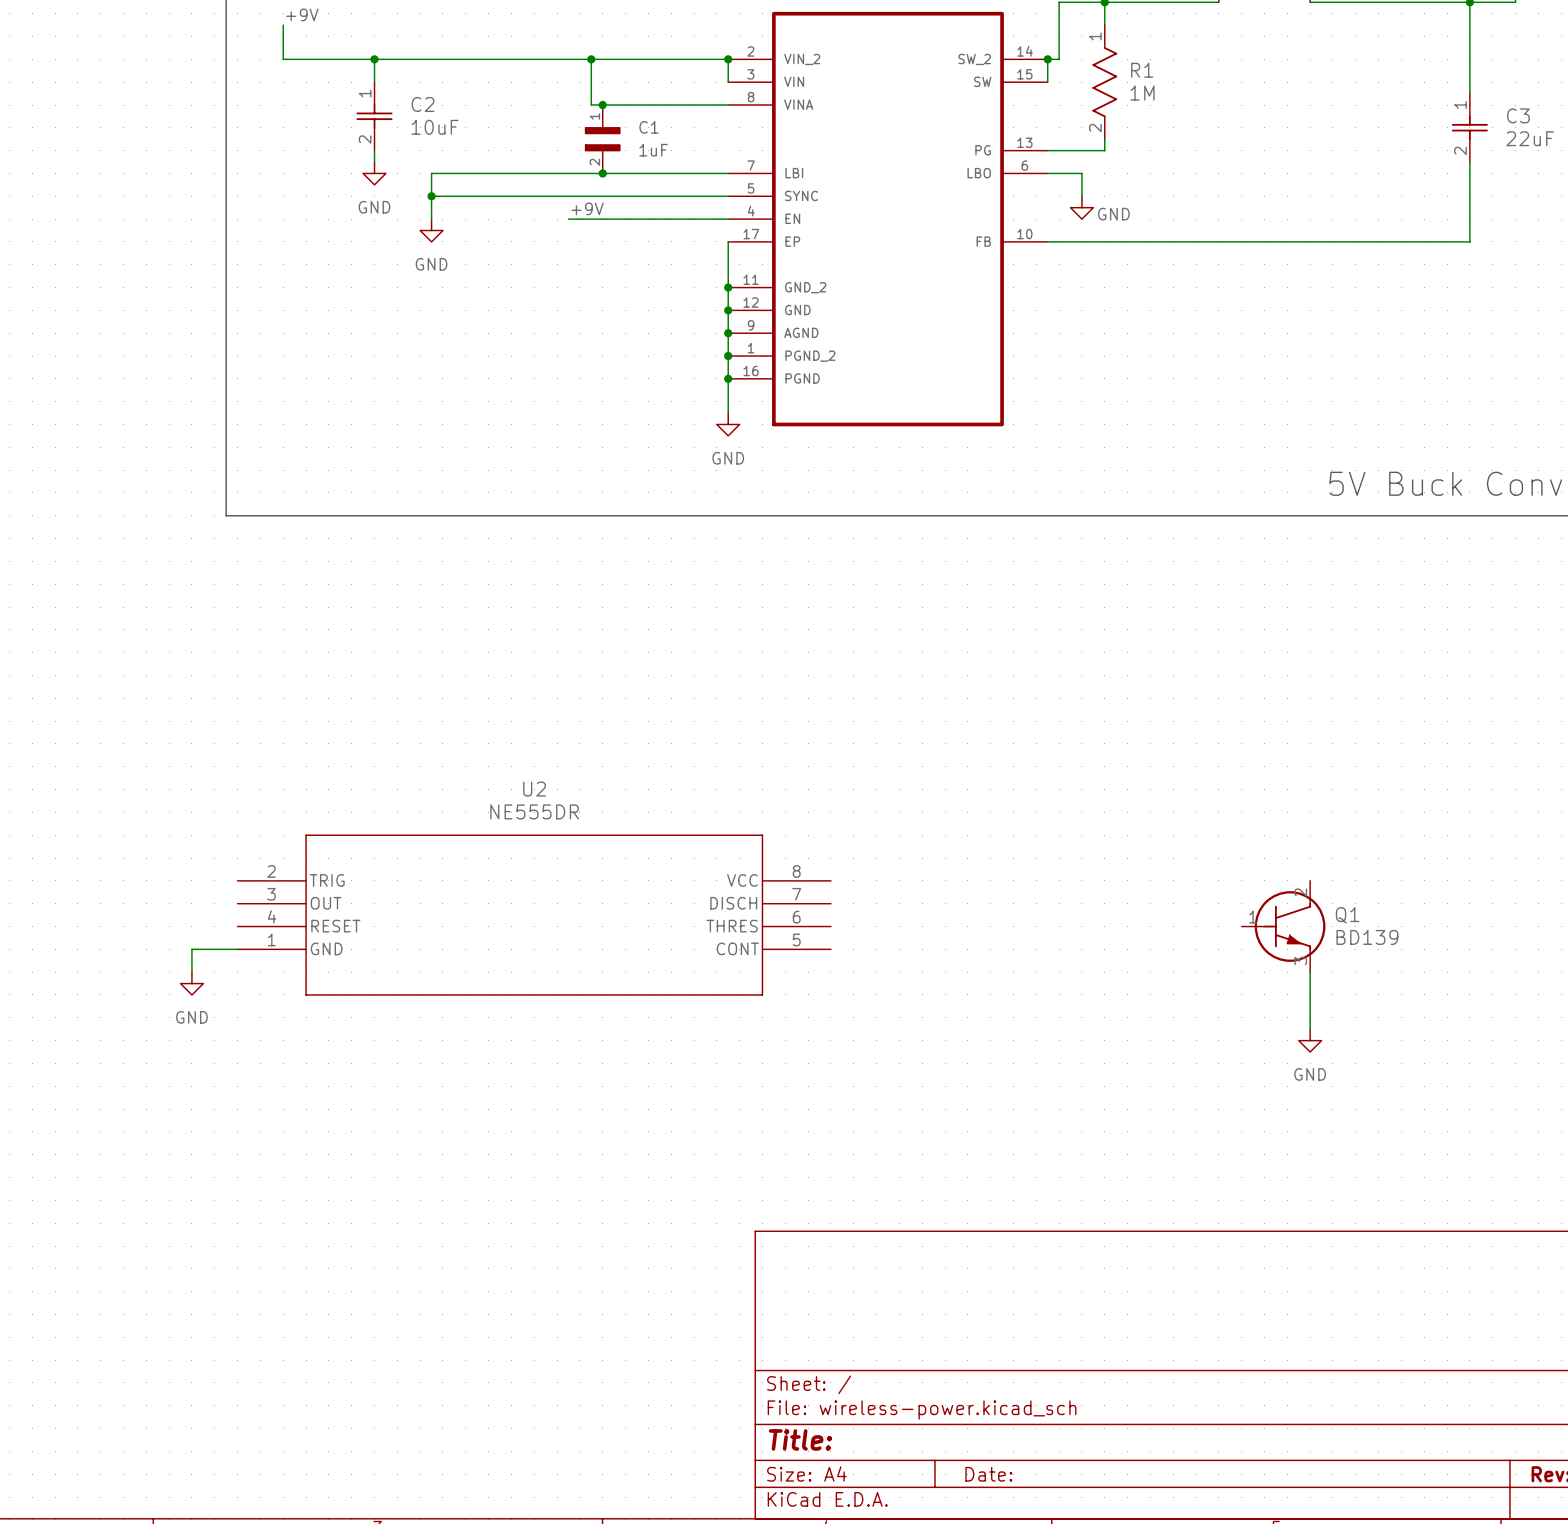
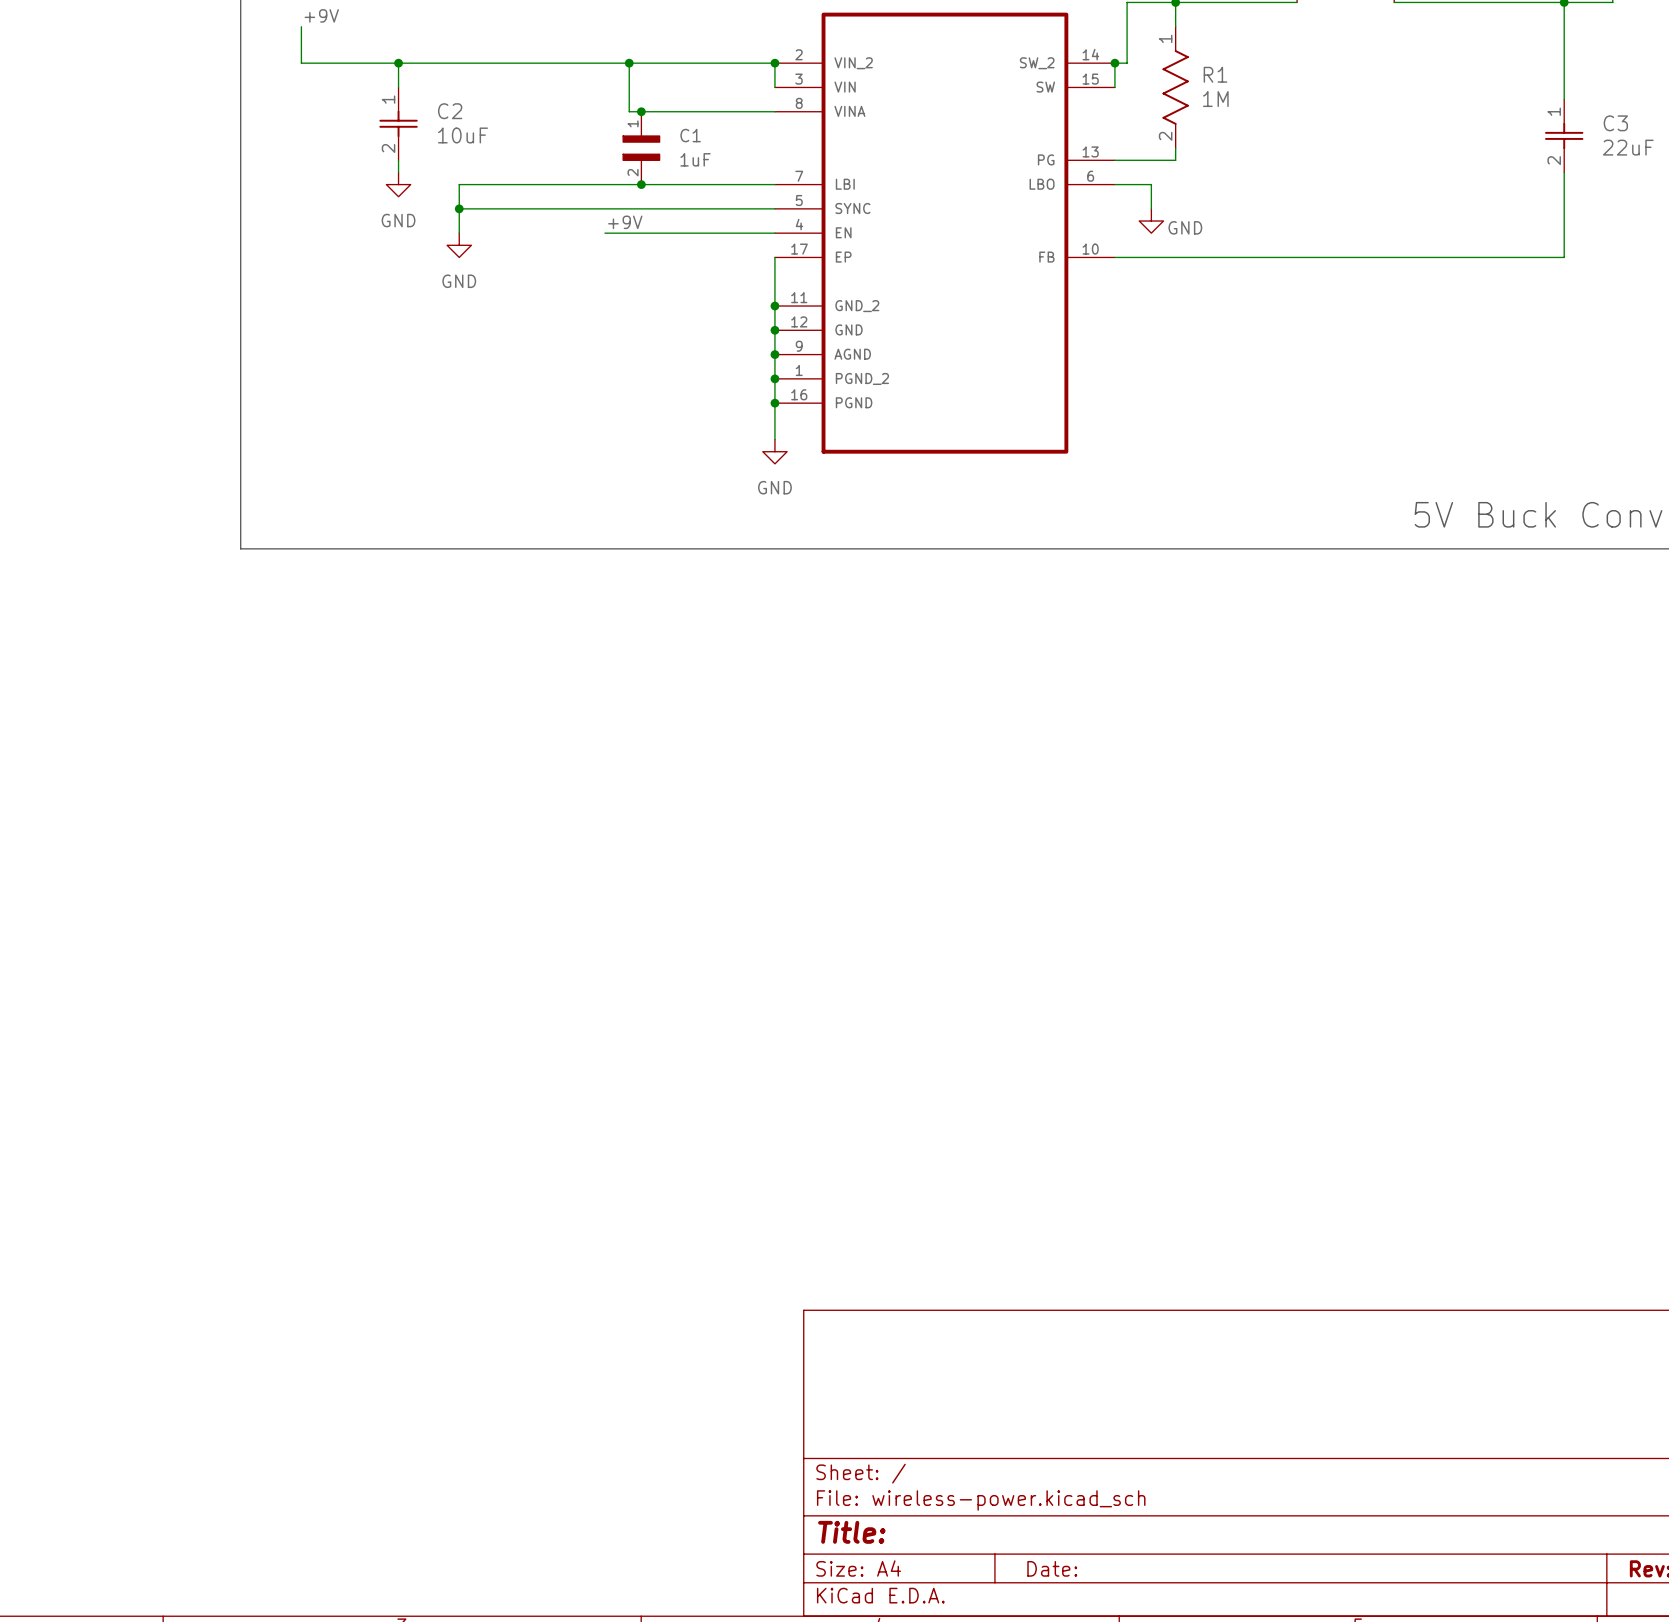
U2: NE555DR (534, 915) -> none
Q1: BD139 (1283, 926) -> none
wire: (237, 949) (191, 949) (191, 972) -> none
wire: (1310, 972) (1310, 1029) -> none
power symbol: GND (191, 983) -> none
power symbol: GND (1310, 1040) -> none

